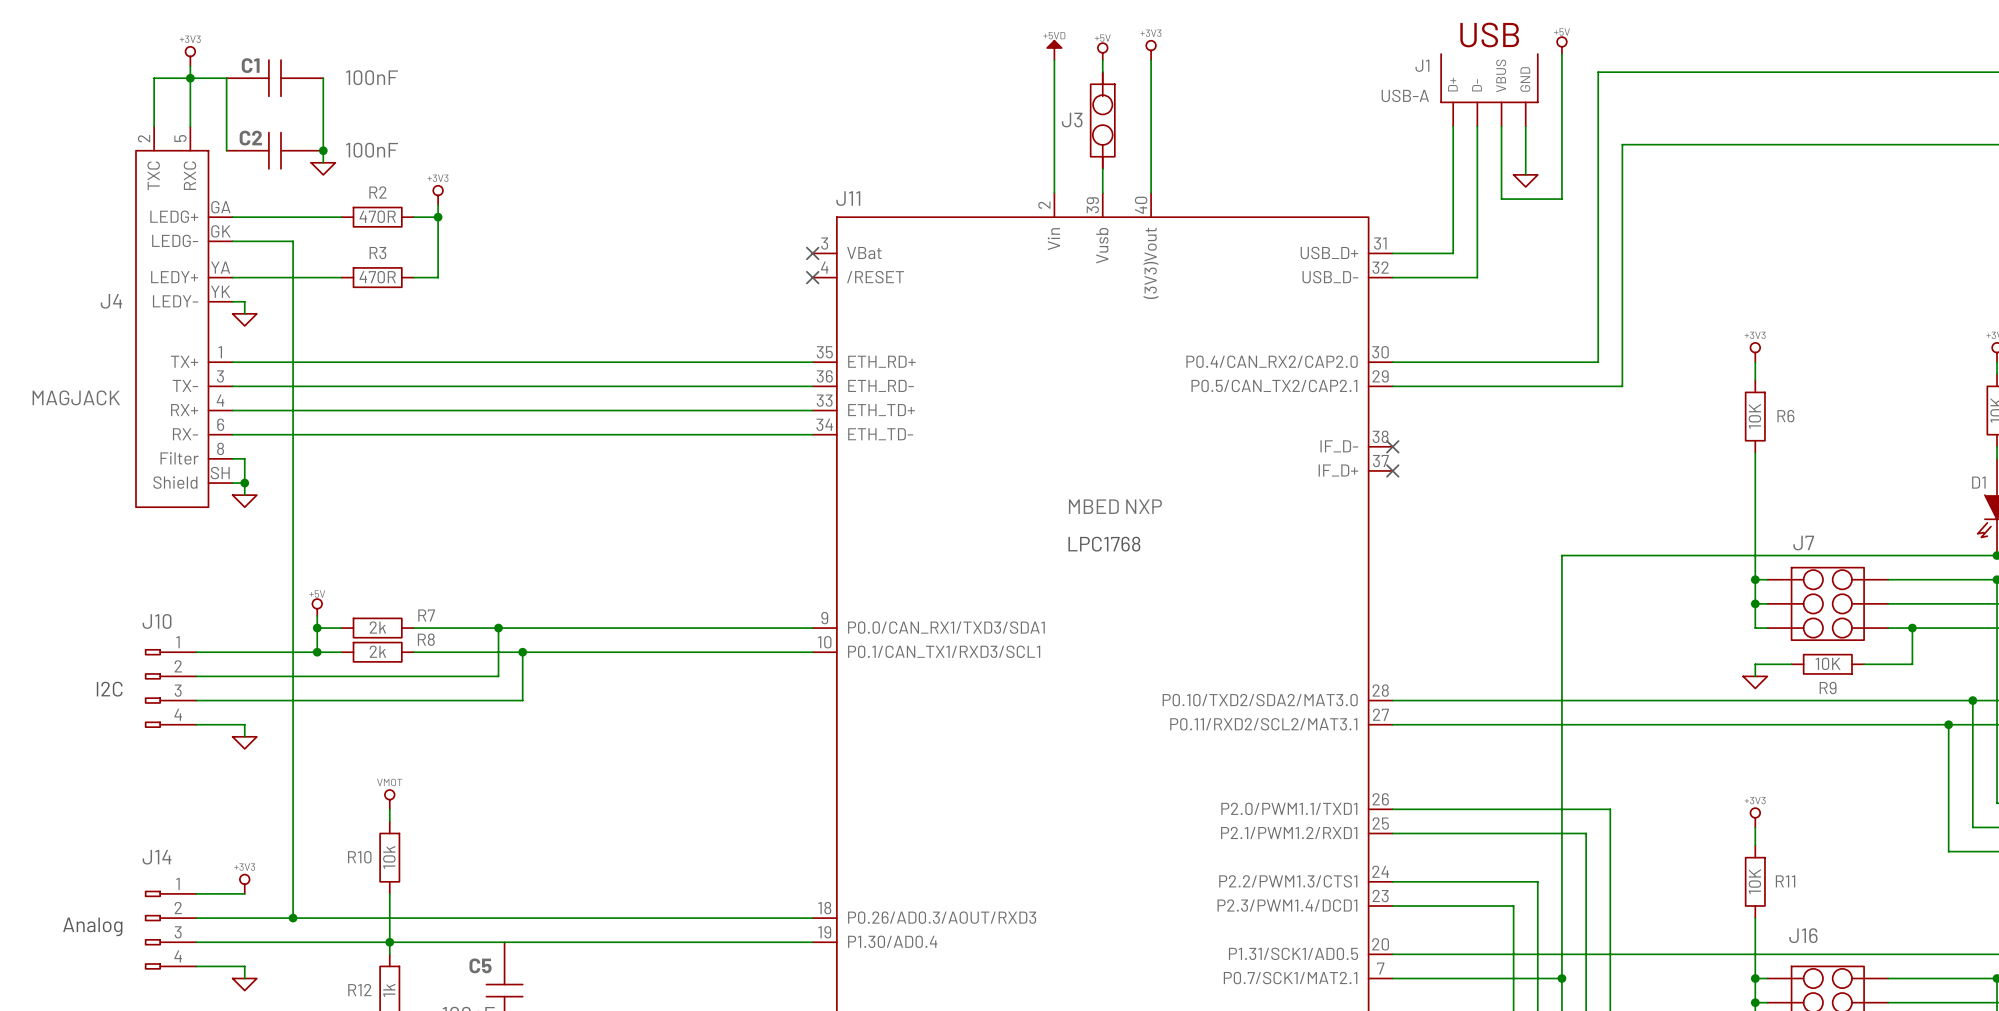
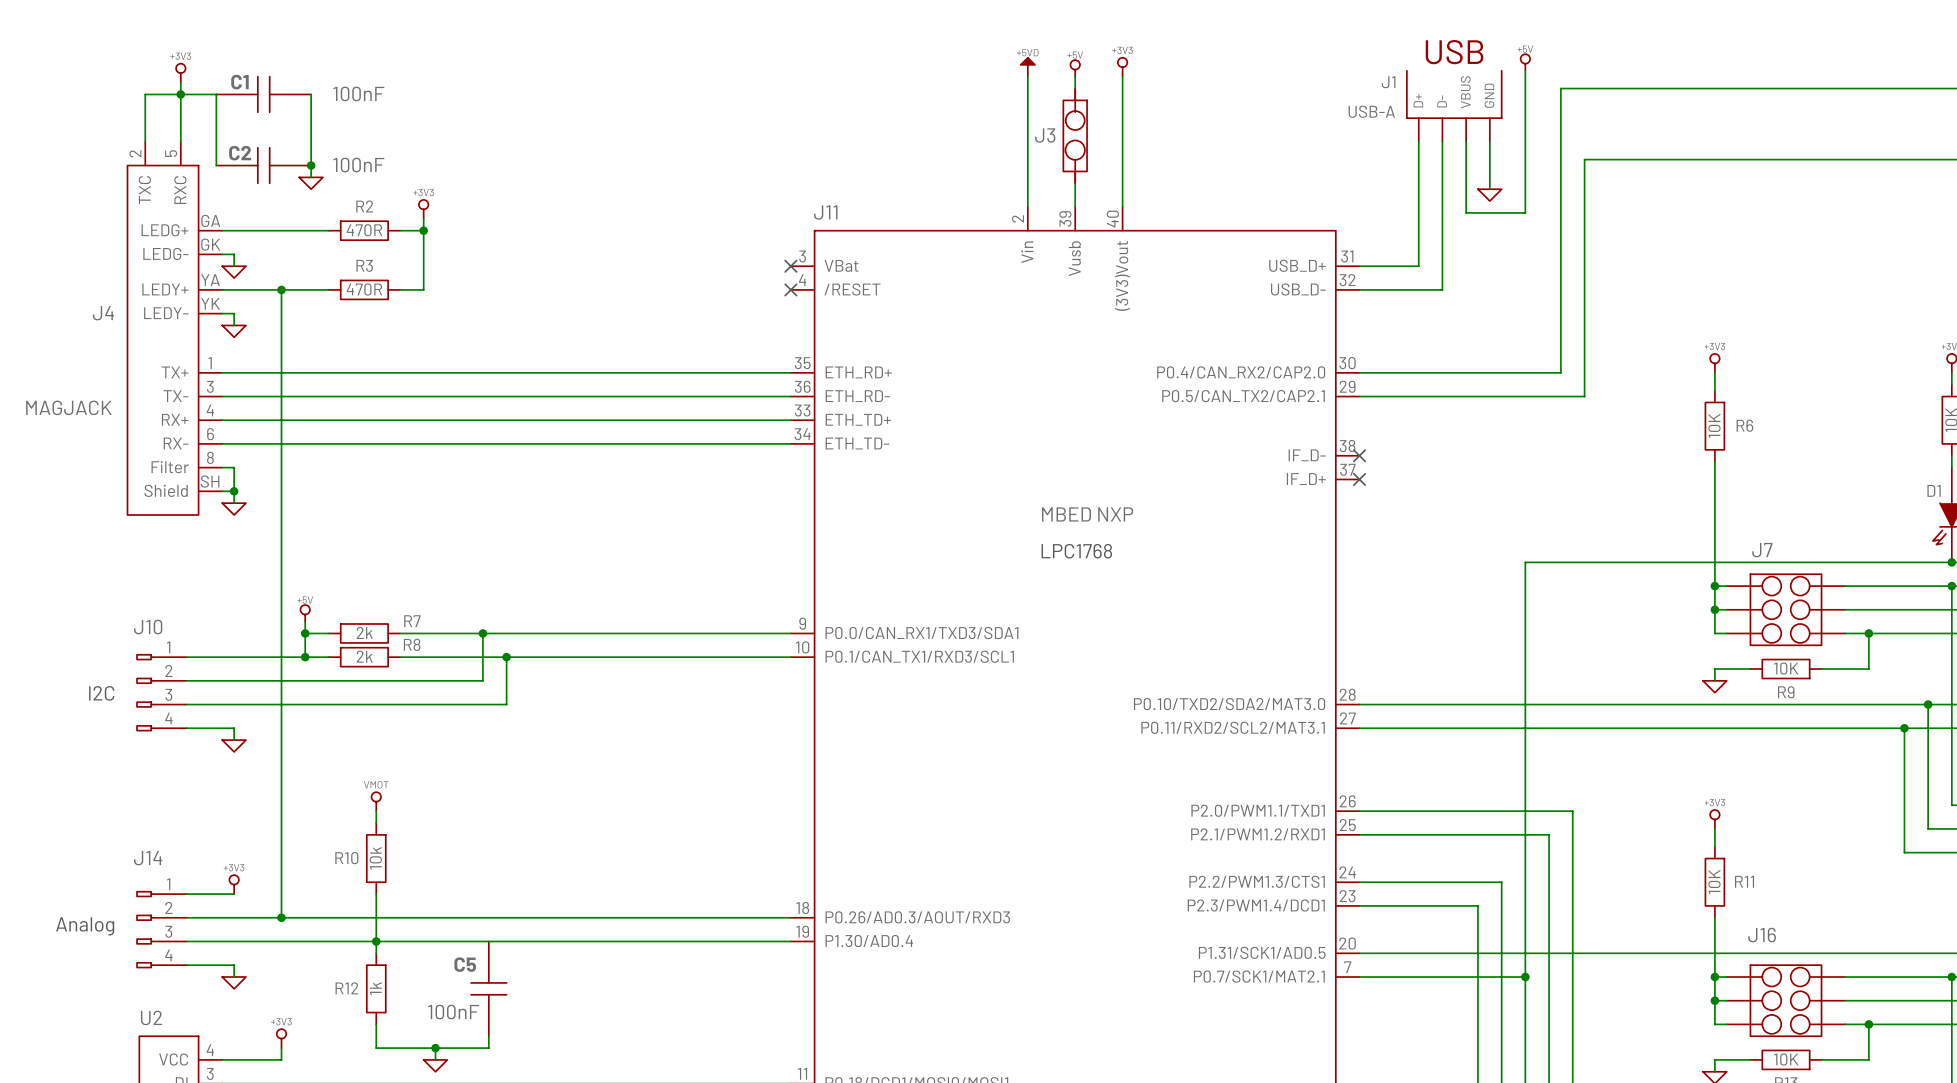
wire: (244, 241) (293, 241) (293, 277) -> (234, 254) (234, 266)
power symbol: none -> (234, 272)
junction: none -> (281, 289)

